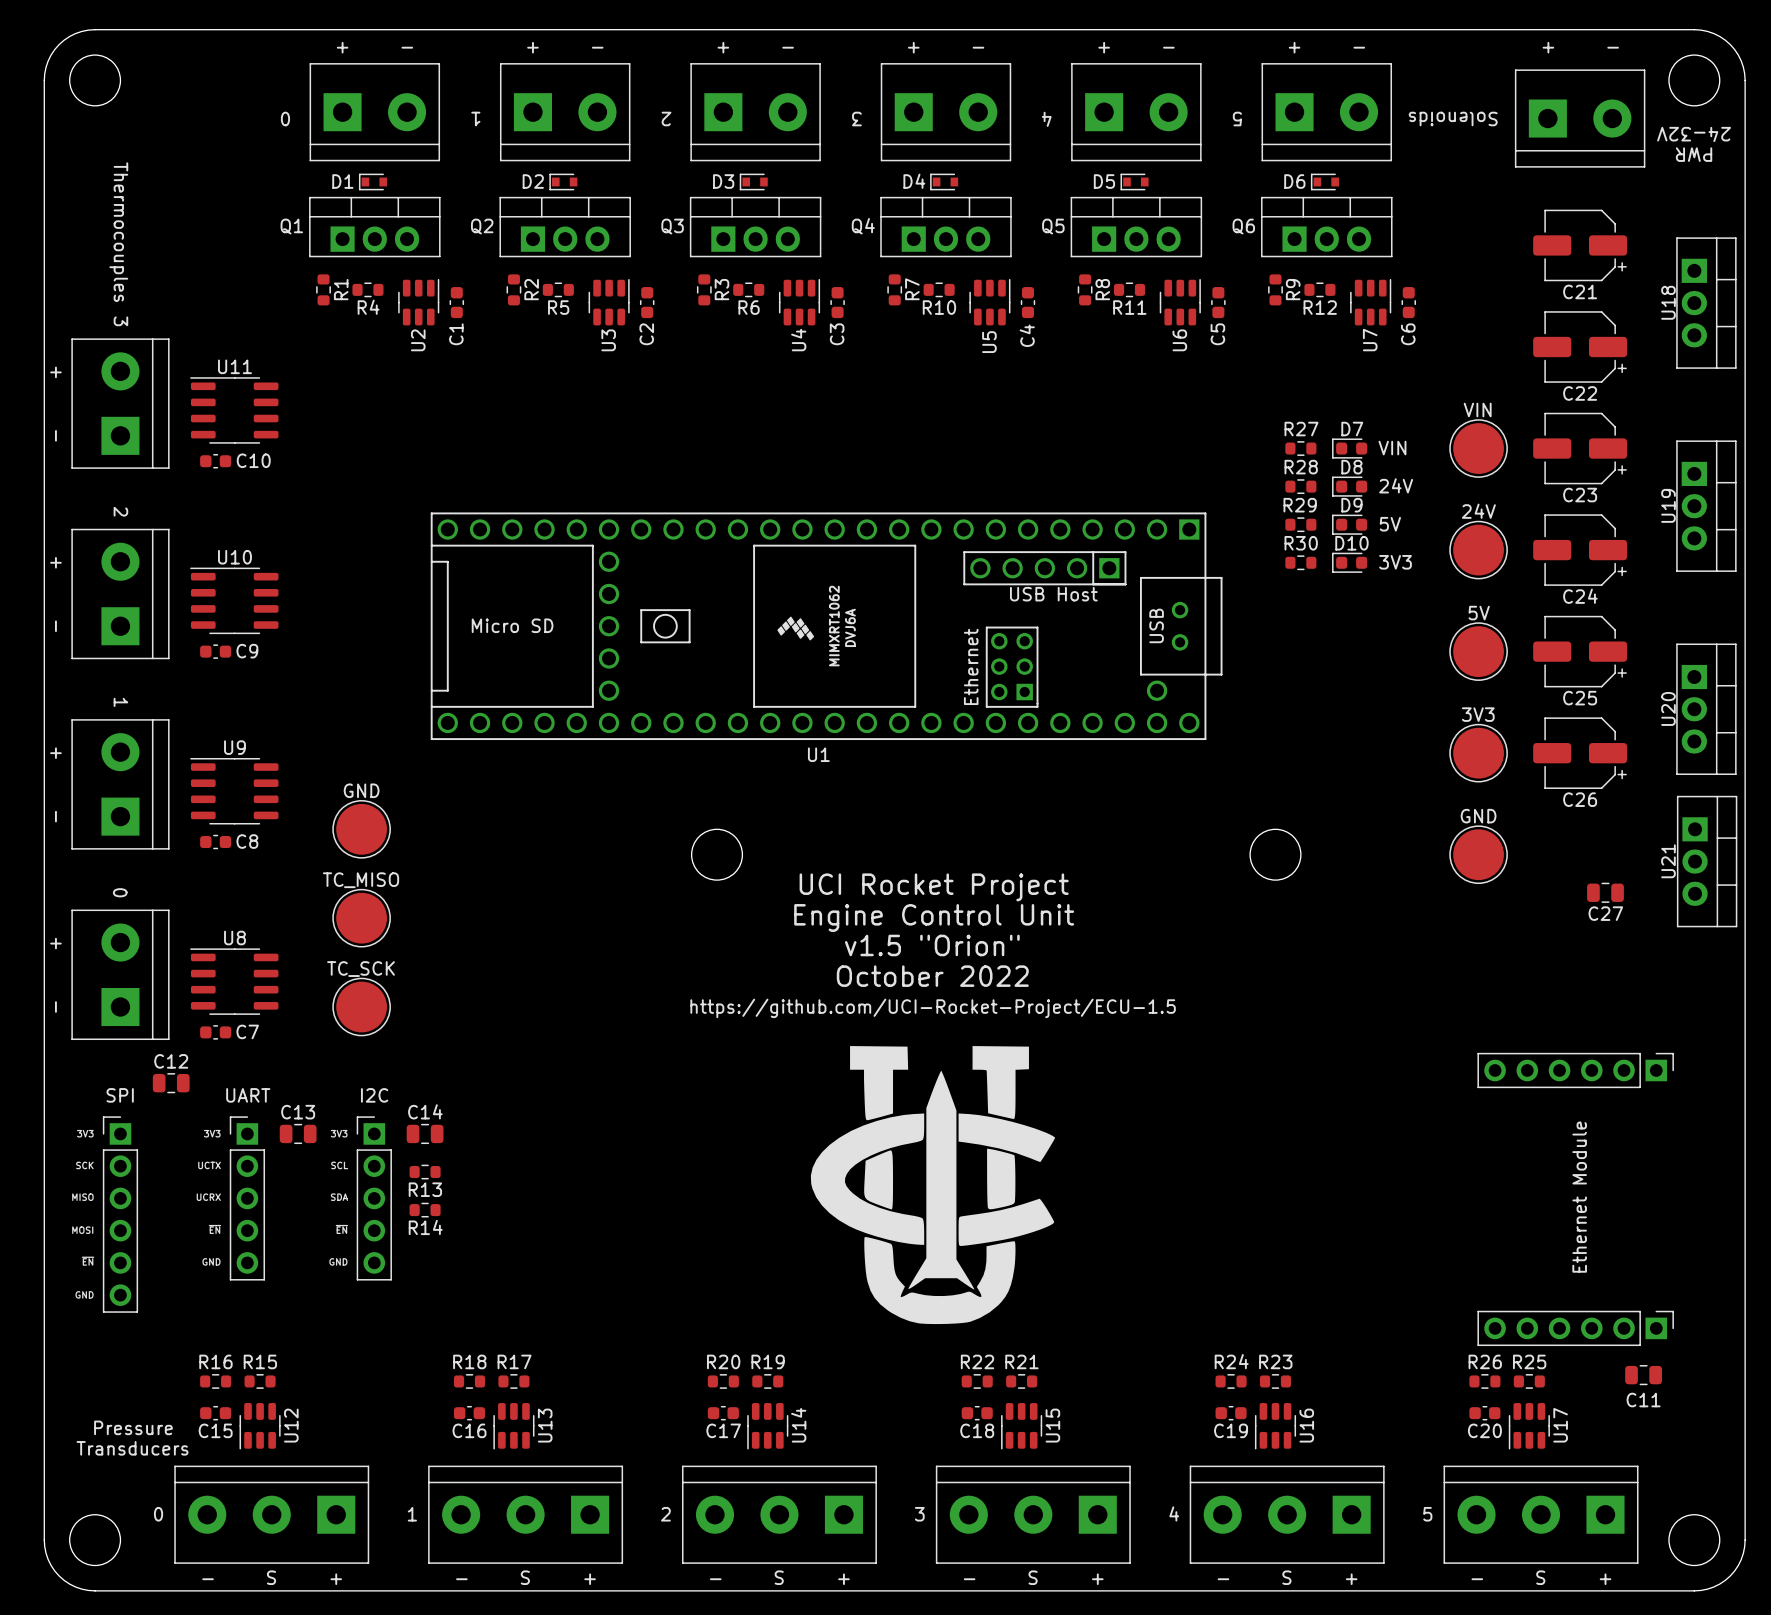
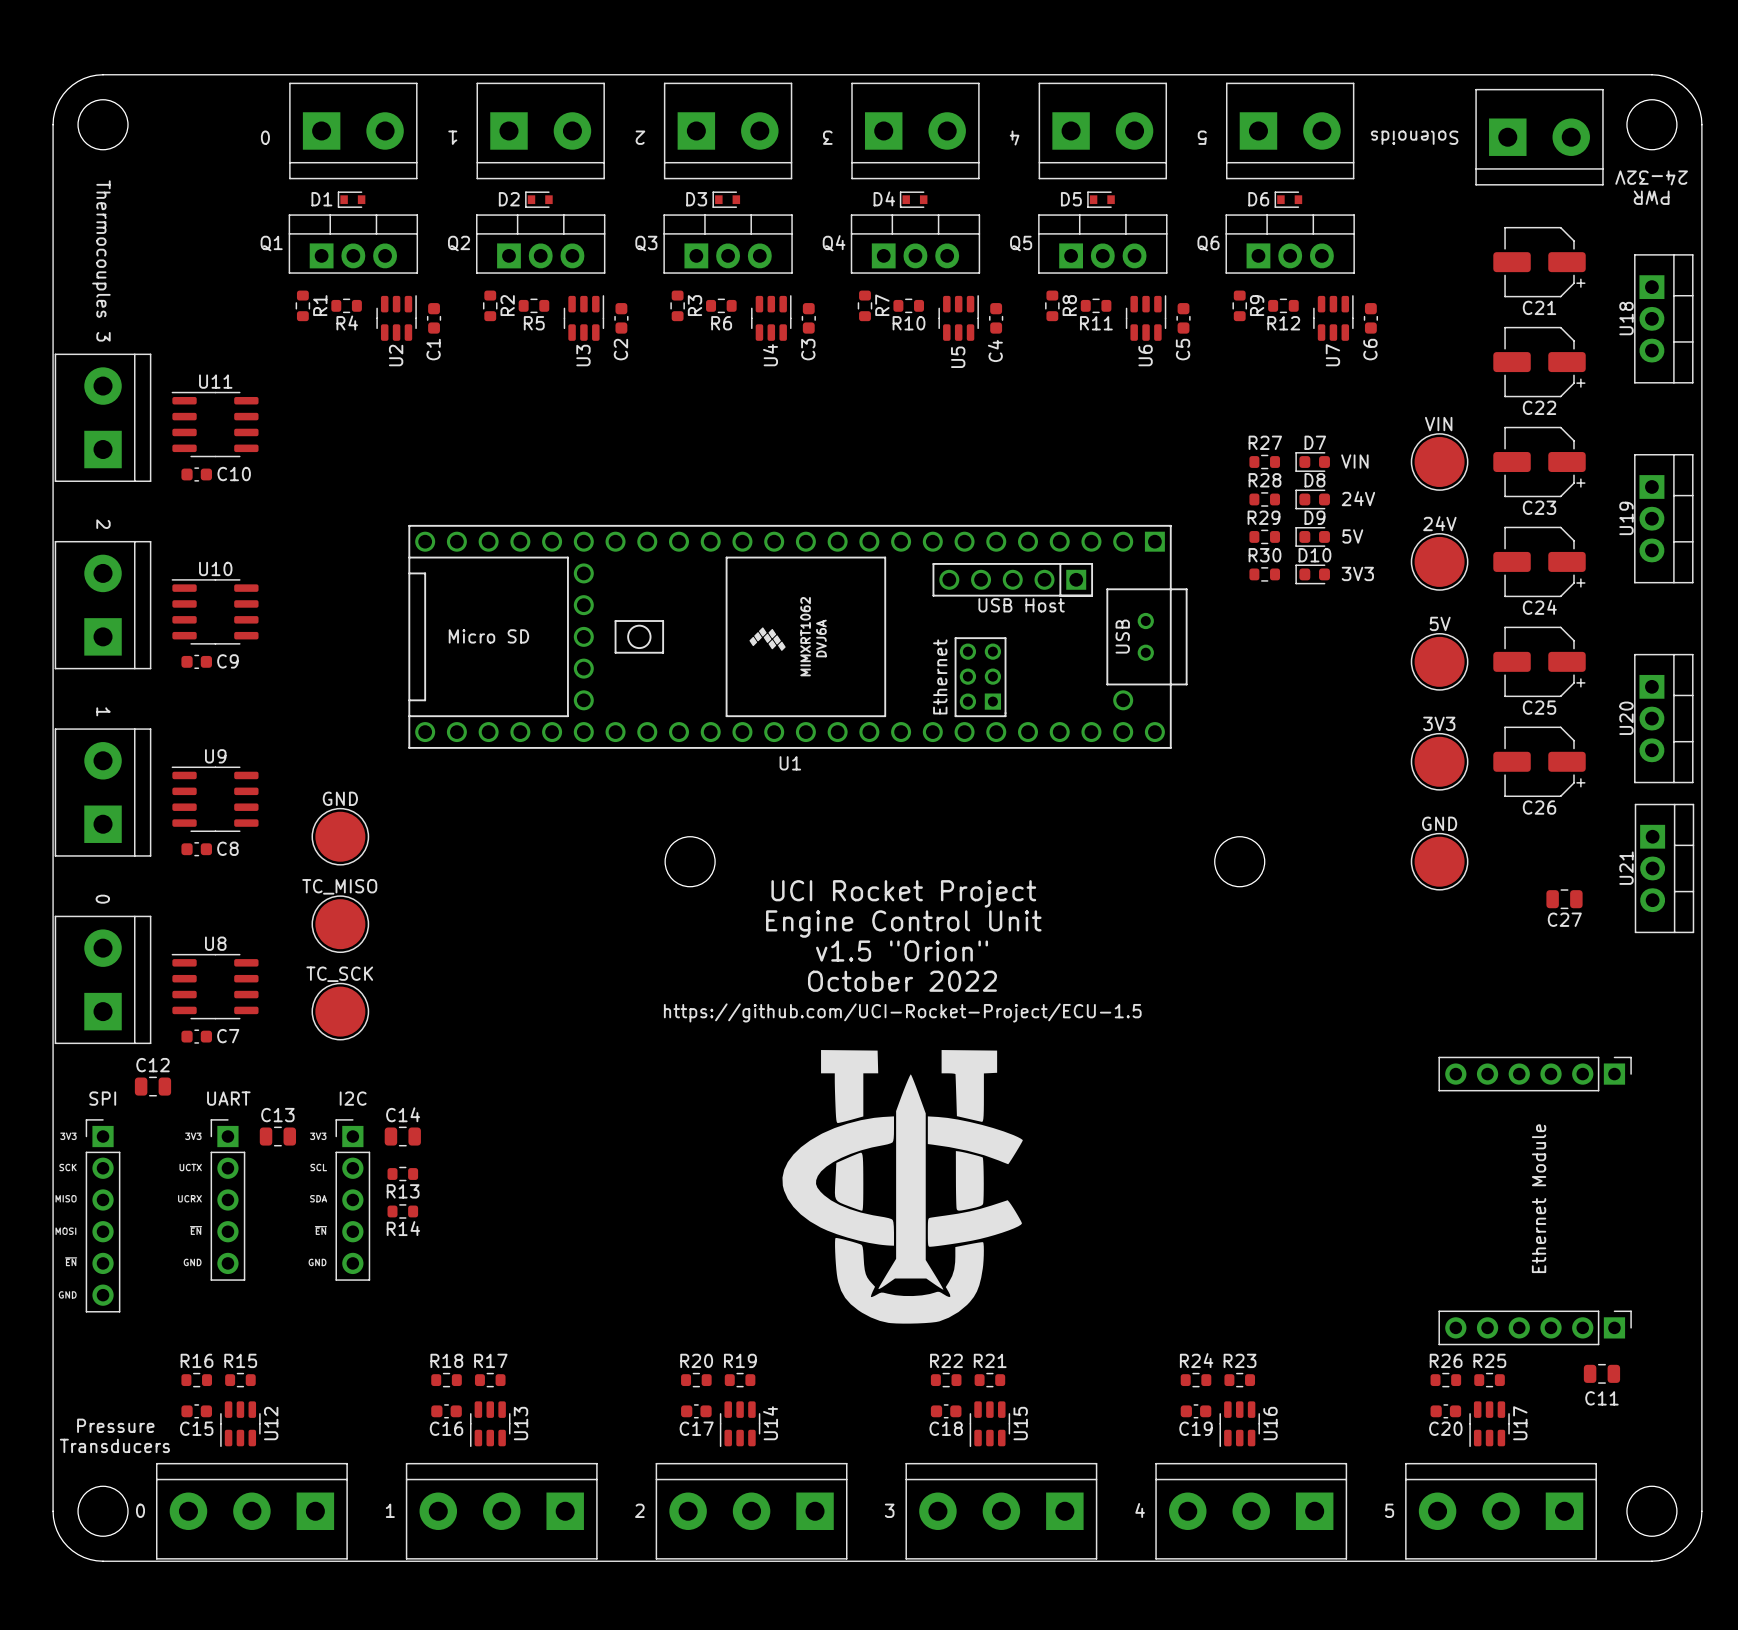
text: + (342, 47) -> none
text: - (407, 47) -> none
text: + (532, 47) -> none
text: - (597, 47) -> none
text: + (723, 47) -> none
text: - (788, 47) -> none
text: + (913, 47) -> none
text: - (978, 47) -> none
text: + (1104, 47) -> none
text: - (1168, 47) -> none
text: + (1294, 47) -> none
text: - (1359, 47) -> none
text: + (1548, 47) -> none
text: - (1613, 47) -> none
round board edge position: (95, 80) -> (103, 124)
round board edge position: (1694, 80) -> (1651, 124)
board edge: (1745, 105) (1744, 73) (1738, 55) (1730, 44) (1719, 36) (1707, 31) (1694, 29) (95, 29) (75, 33) (59, 44) (48, 61) (44, 80) (44, 1540) (46, 1553) (51, 1565) (64, 1580) (75, 1587) (95, 1590) (1694, 1590) (1707, 1589) (1719, 1584) (1730, 1576) (1738, 1565) (1744, 1546) (1745, 1514) -> (1701, 124) (1698, 105) (1687, 89) (1671, 78) (1651, 74) (103, 74) (83, 78) (67, 89) (56, 105) (53, 124) (53, 1511) (54, 1524) (59, 1536) (72, 1550) (83, 1557) (103, 1561) (1651, 1561) (1671, 1557) (1687, 1546) (1698, 1530) (1701, 1511)
text position: 24-32V (1694, 134) -> 24-32V (1651, 177)
text position: PWR (1694, 154) -> PWR (1651, 197)
text: + (55, 372) -> none
text: - (55, 435) -> none
text: + (55, 562) -> none
text: - (55, 626) -> none
text: + (55, 753) -> none
text: - (55, 816) -> none
text: + (55, 943) -> none
text: - (55, 1007) -> none
round board edge position: (95, 1540) -> (103, 1511)
round board edge position: (1694, 1540) -> (1651, 1511)
text: S (271, 1577) -> none
text: S (525, 1577) -> none
text: S (779, 1577) -> none
text: S (1033, 1577) -> none
text: S (1286, 1577) -> none
text: S (1540, 1577) -> none
text: - (208, 1579) -> none
text: + (336, 1579) -> none
text: - (461, 1579) -> none
text: + (590, 1579) -> none
text: - (715, 1579) -> none
text: + (843, 1579) -> none
text: - (969, 1579) -> none
text: + (1097, 1579) -> none
text: - (1223, 1579) -> none
text: + (1351, 1579) -> none
text: - (1477, 1579) -> none
text: + (1605, 1579) -> none

